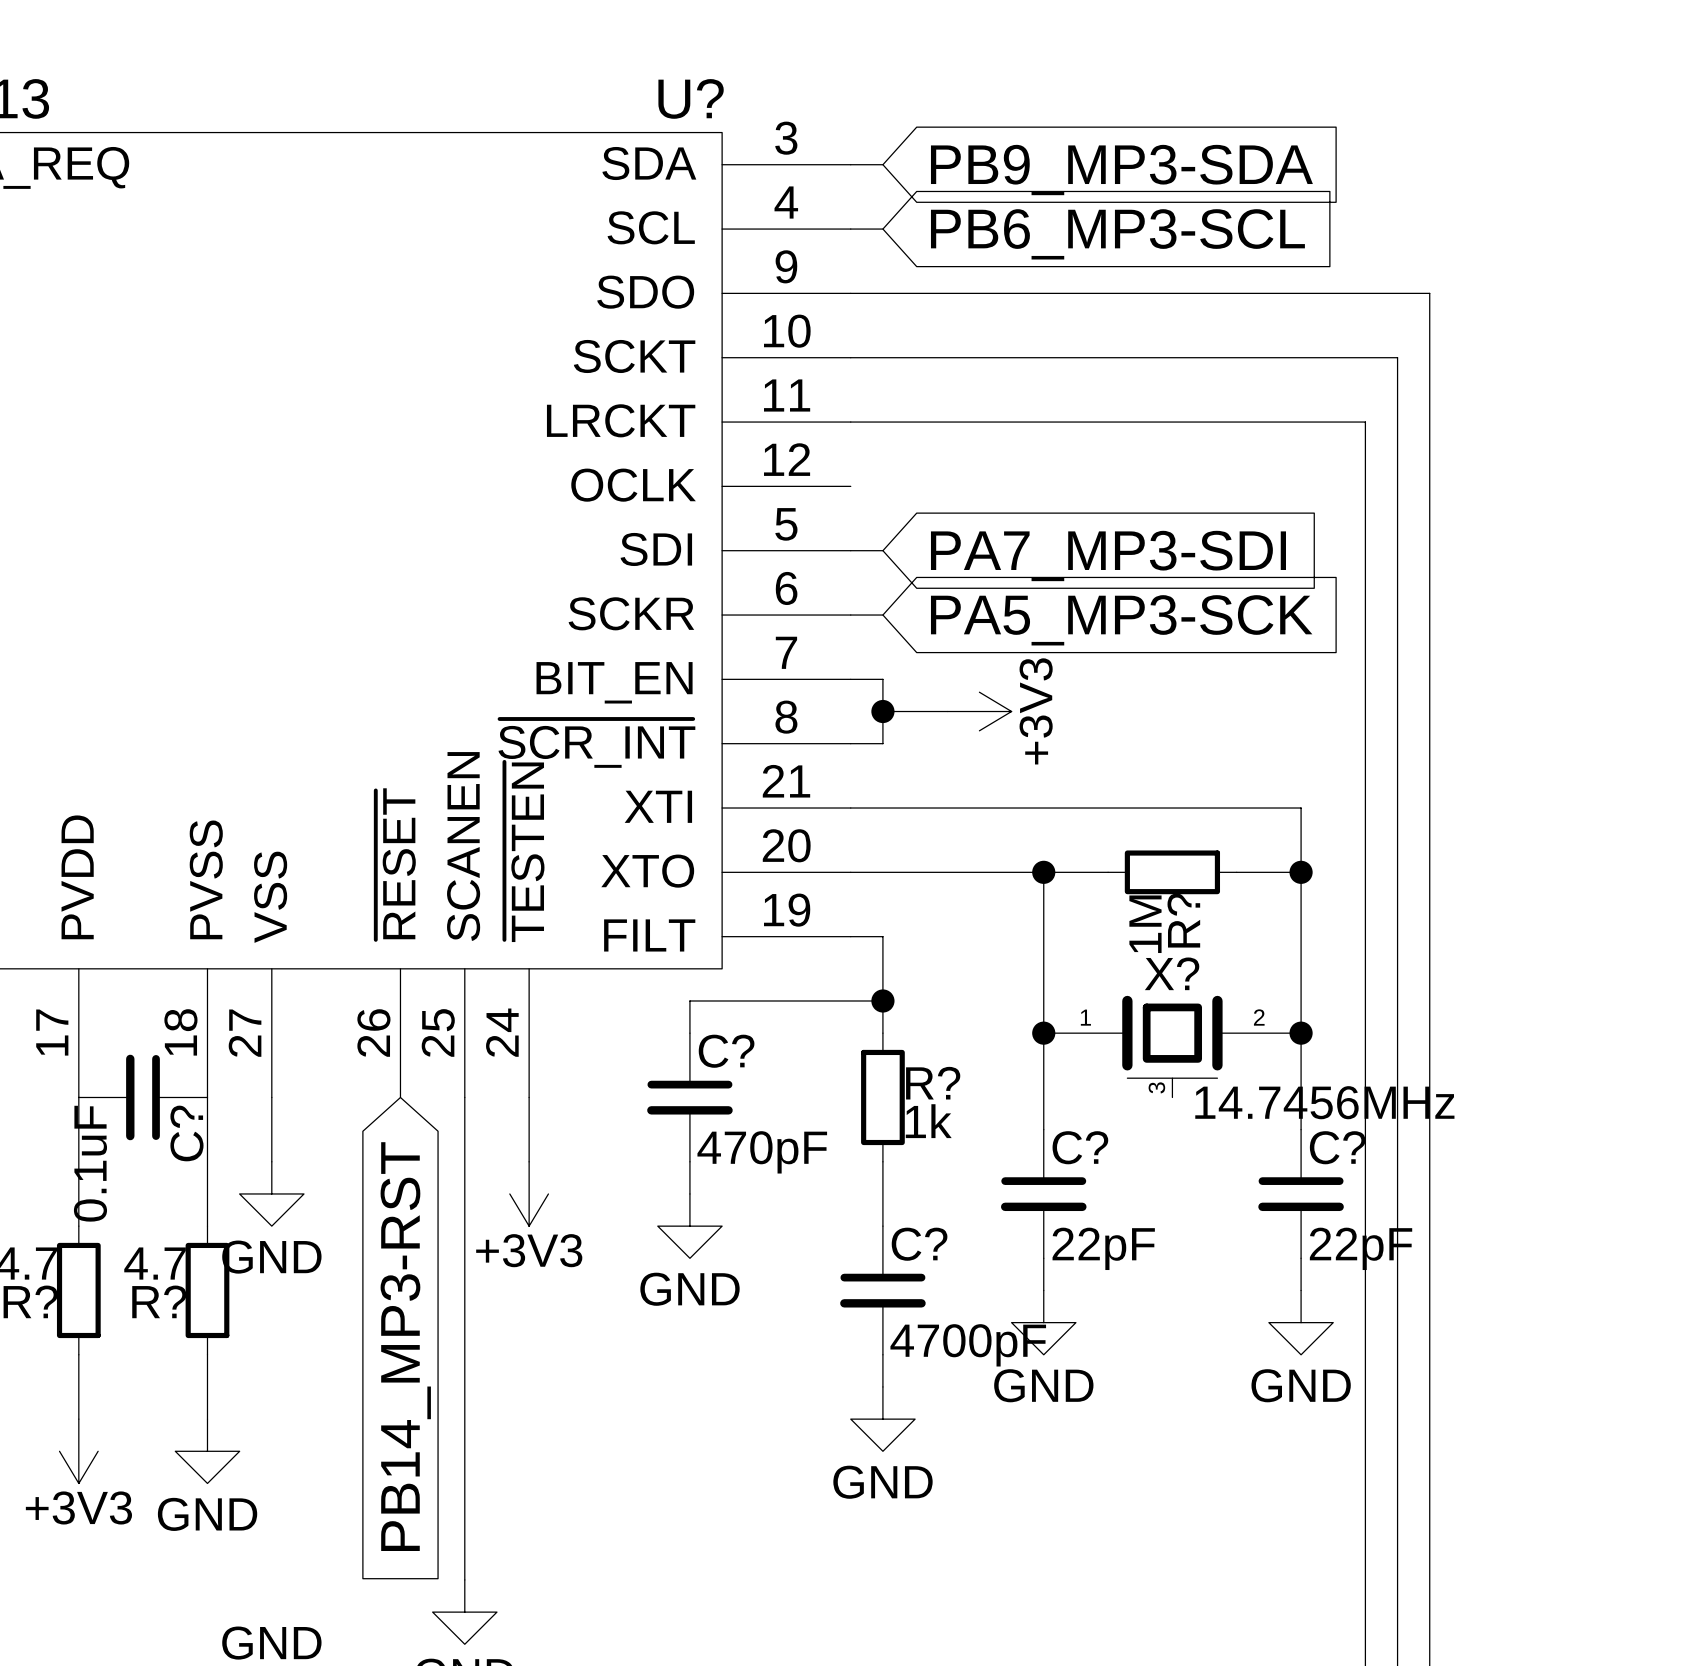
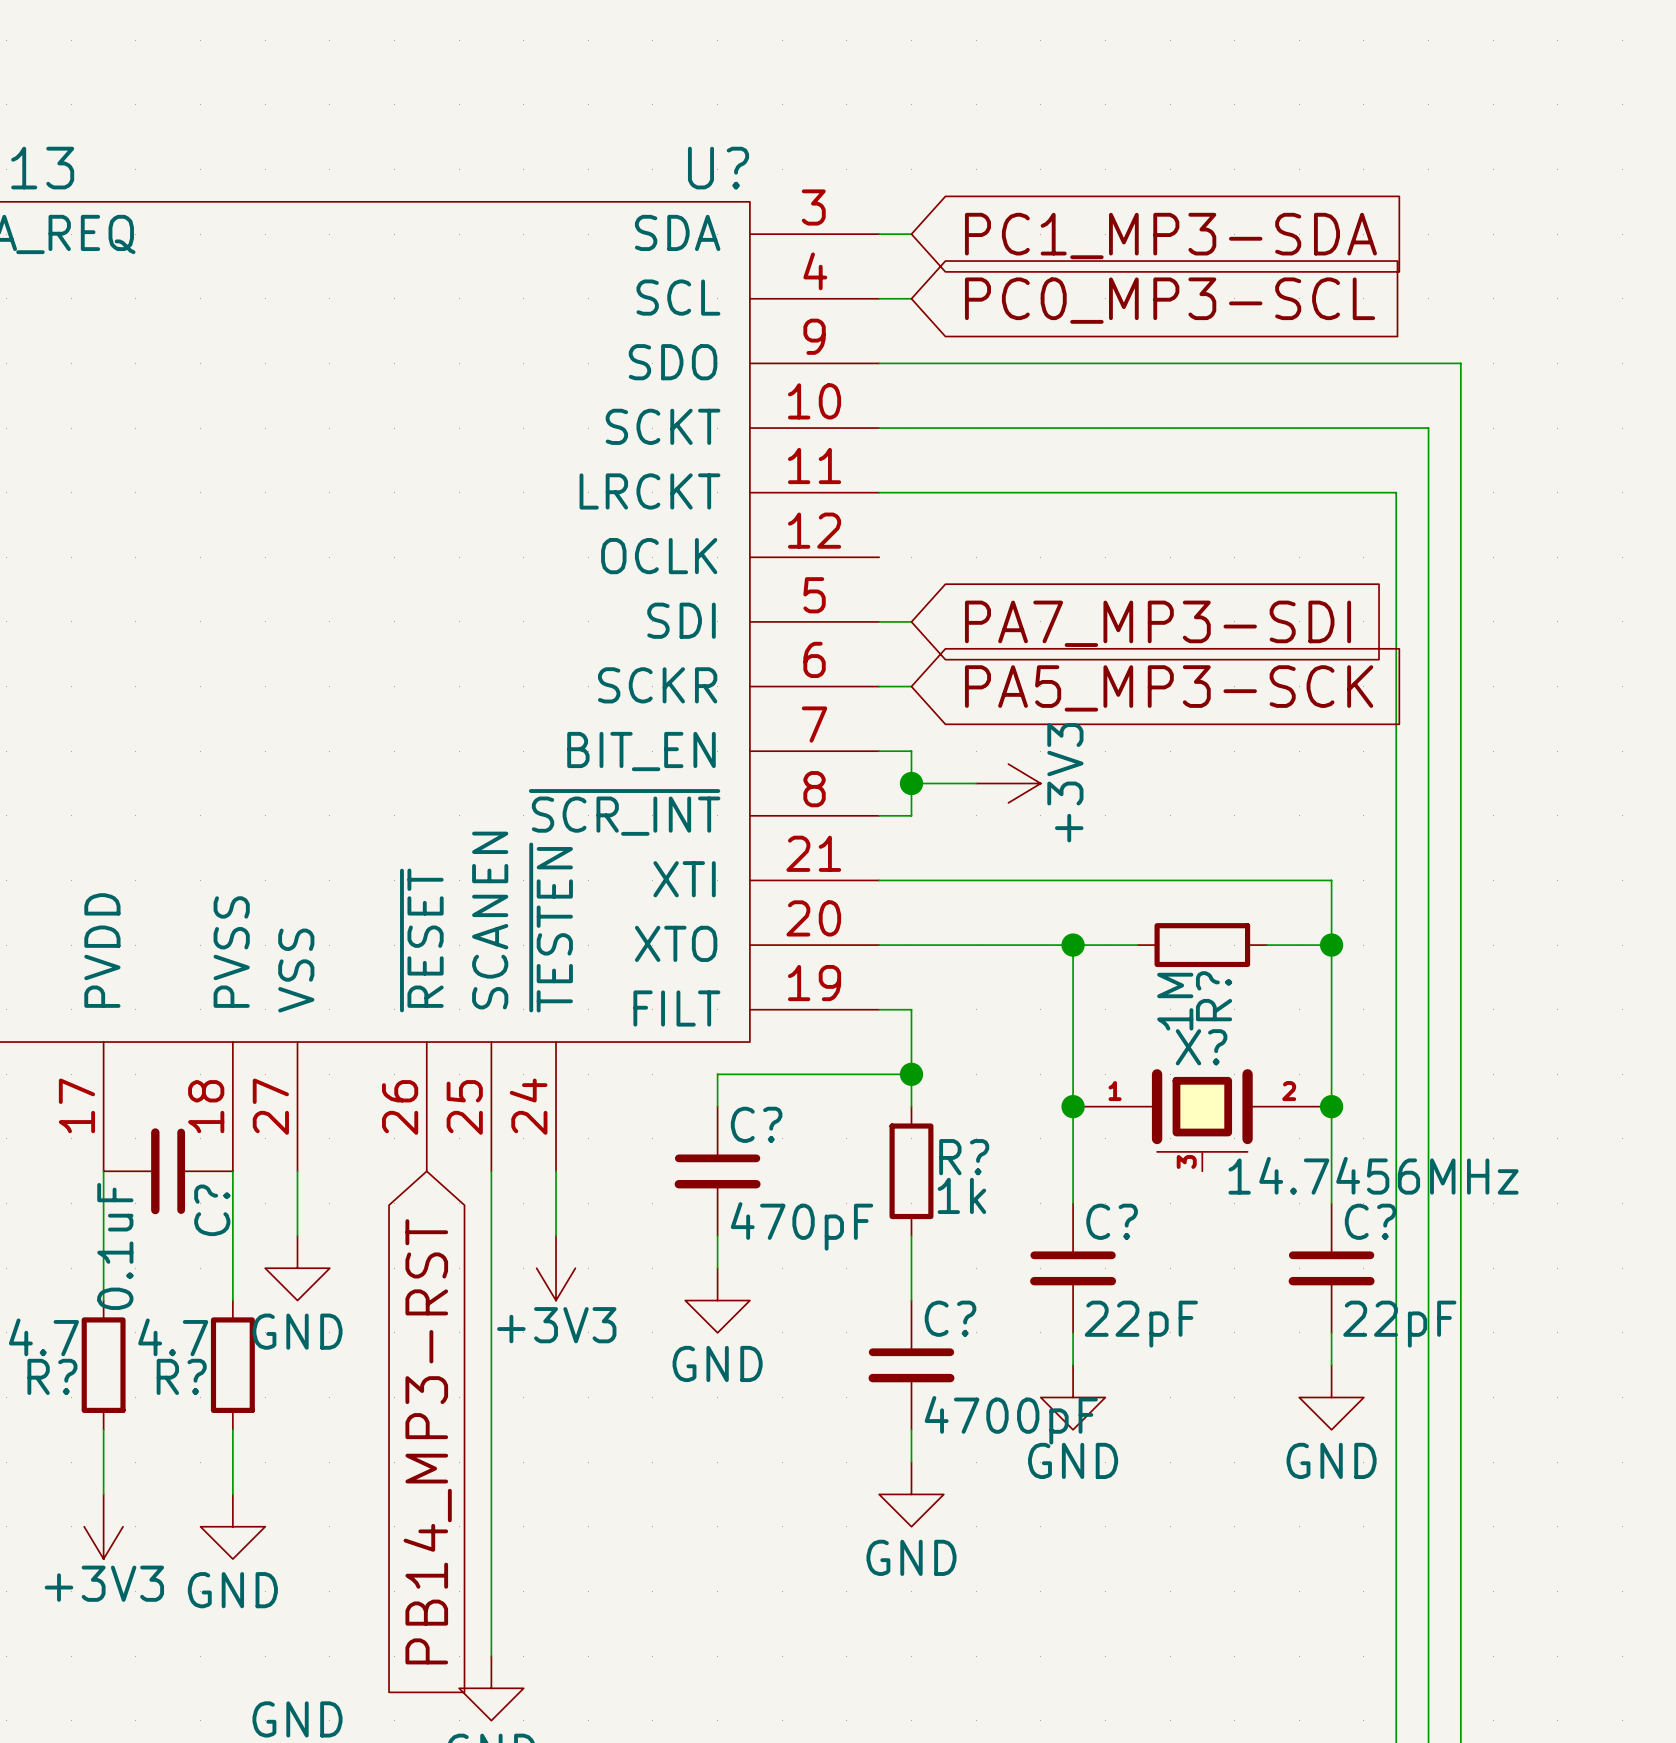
global label: PB9_MP3-SDA (1121, 170) -> PC1_MP3-SDA (1170, 235)
global label: PB6_MP3-SCL (1117, 234) -> PC0_MP3-SCL (1170, 300)

